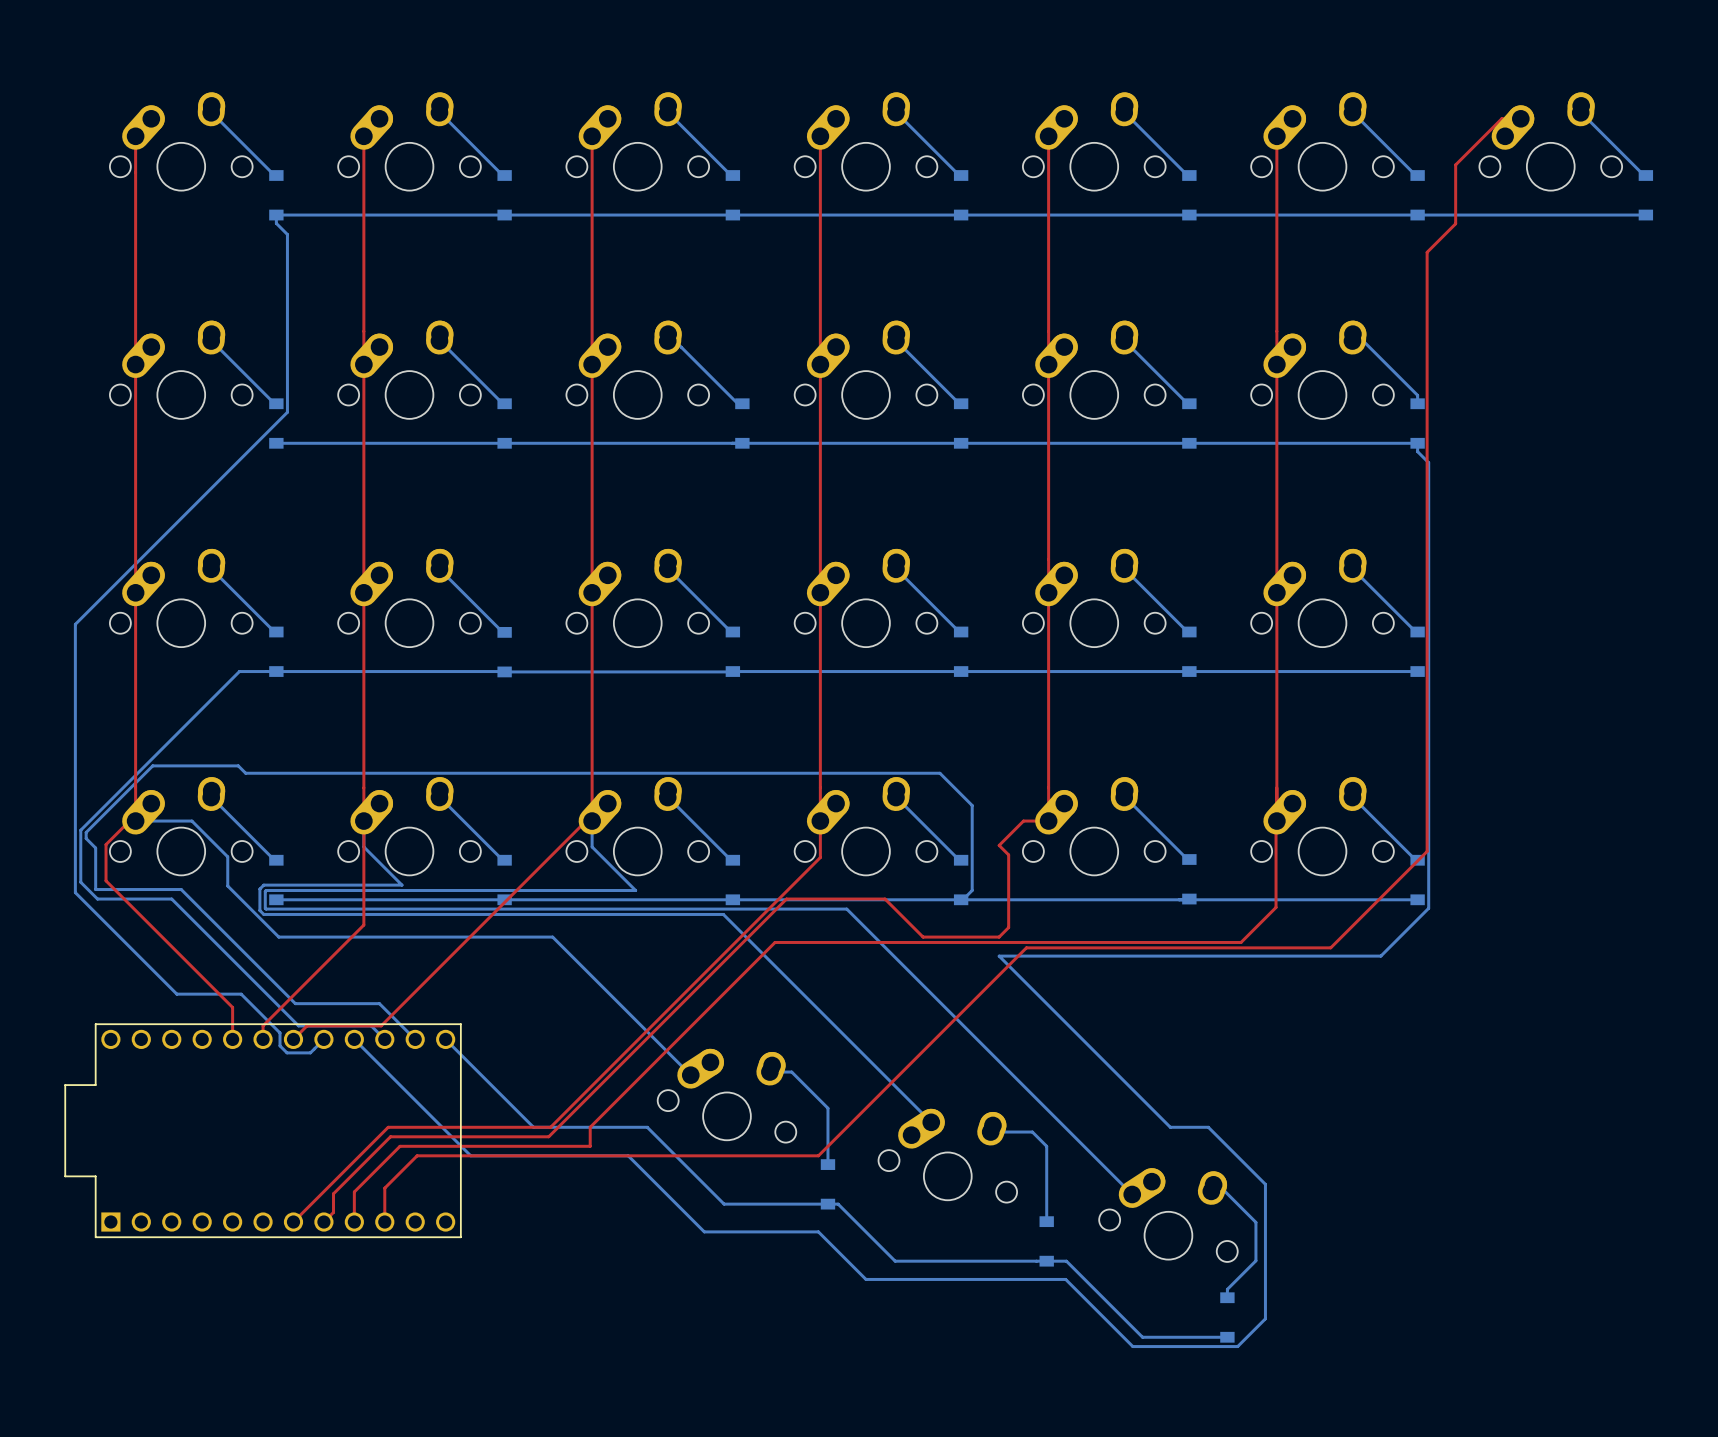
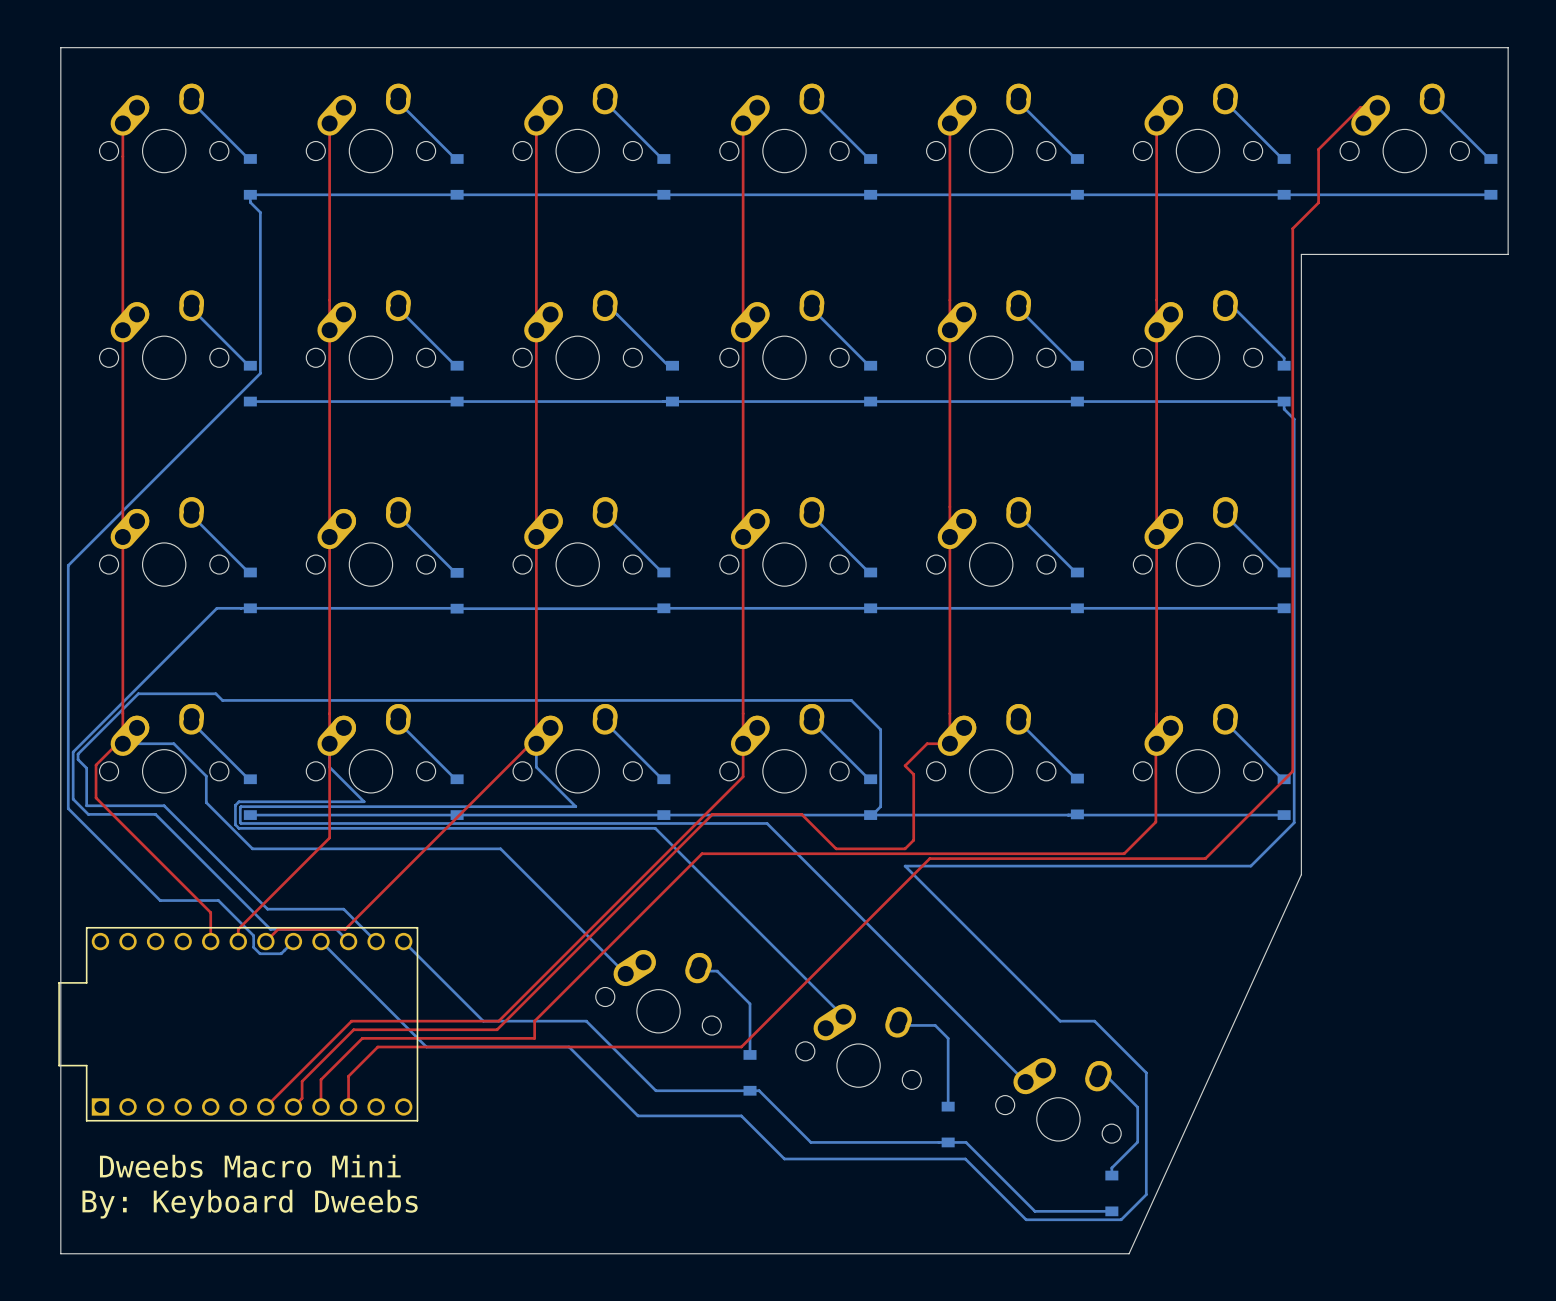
board edge: none -> (60, 47) (1508, 47) (1508, 254) (1301, 254) (1301, 874) (1129, 1253) (60, 1253) (60, 47)
text: none -> Dweebs Macro Mini (250, 1166)
text: none -> By: Keyboard Dweebs (250, 1204)

